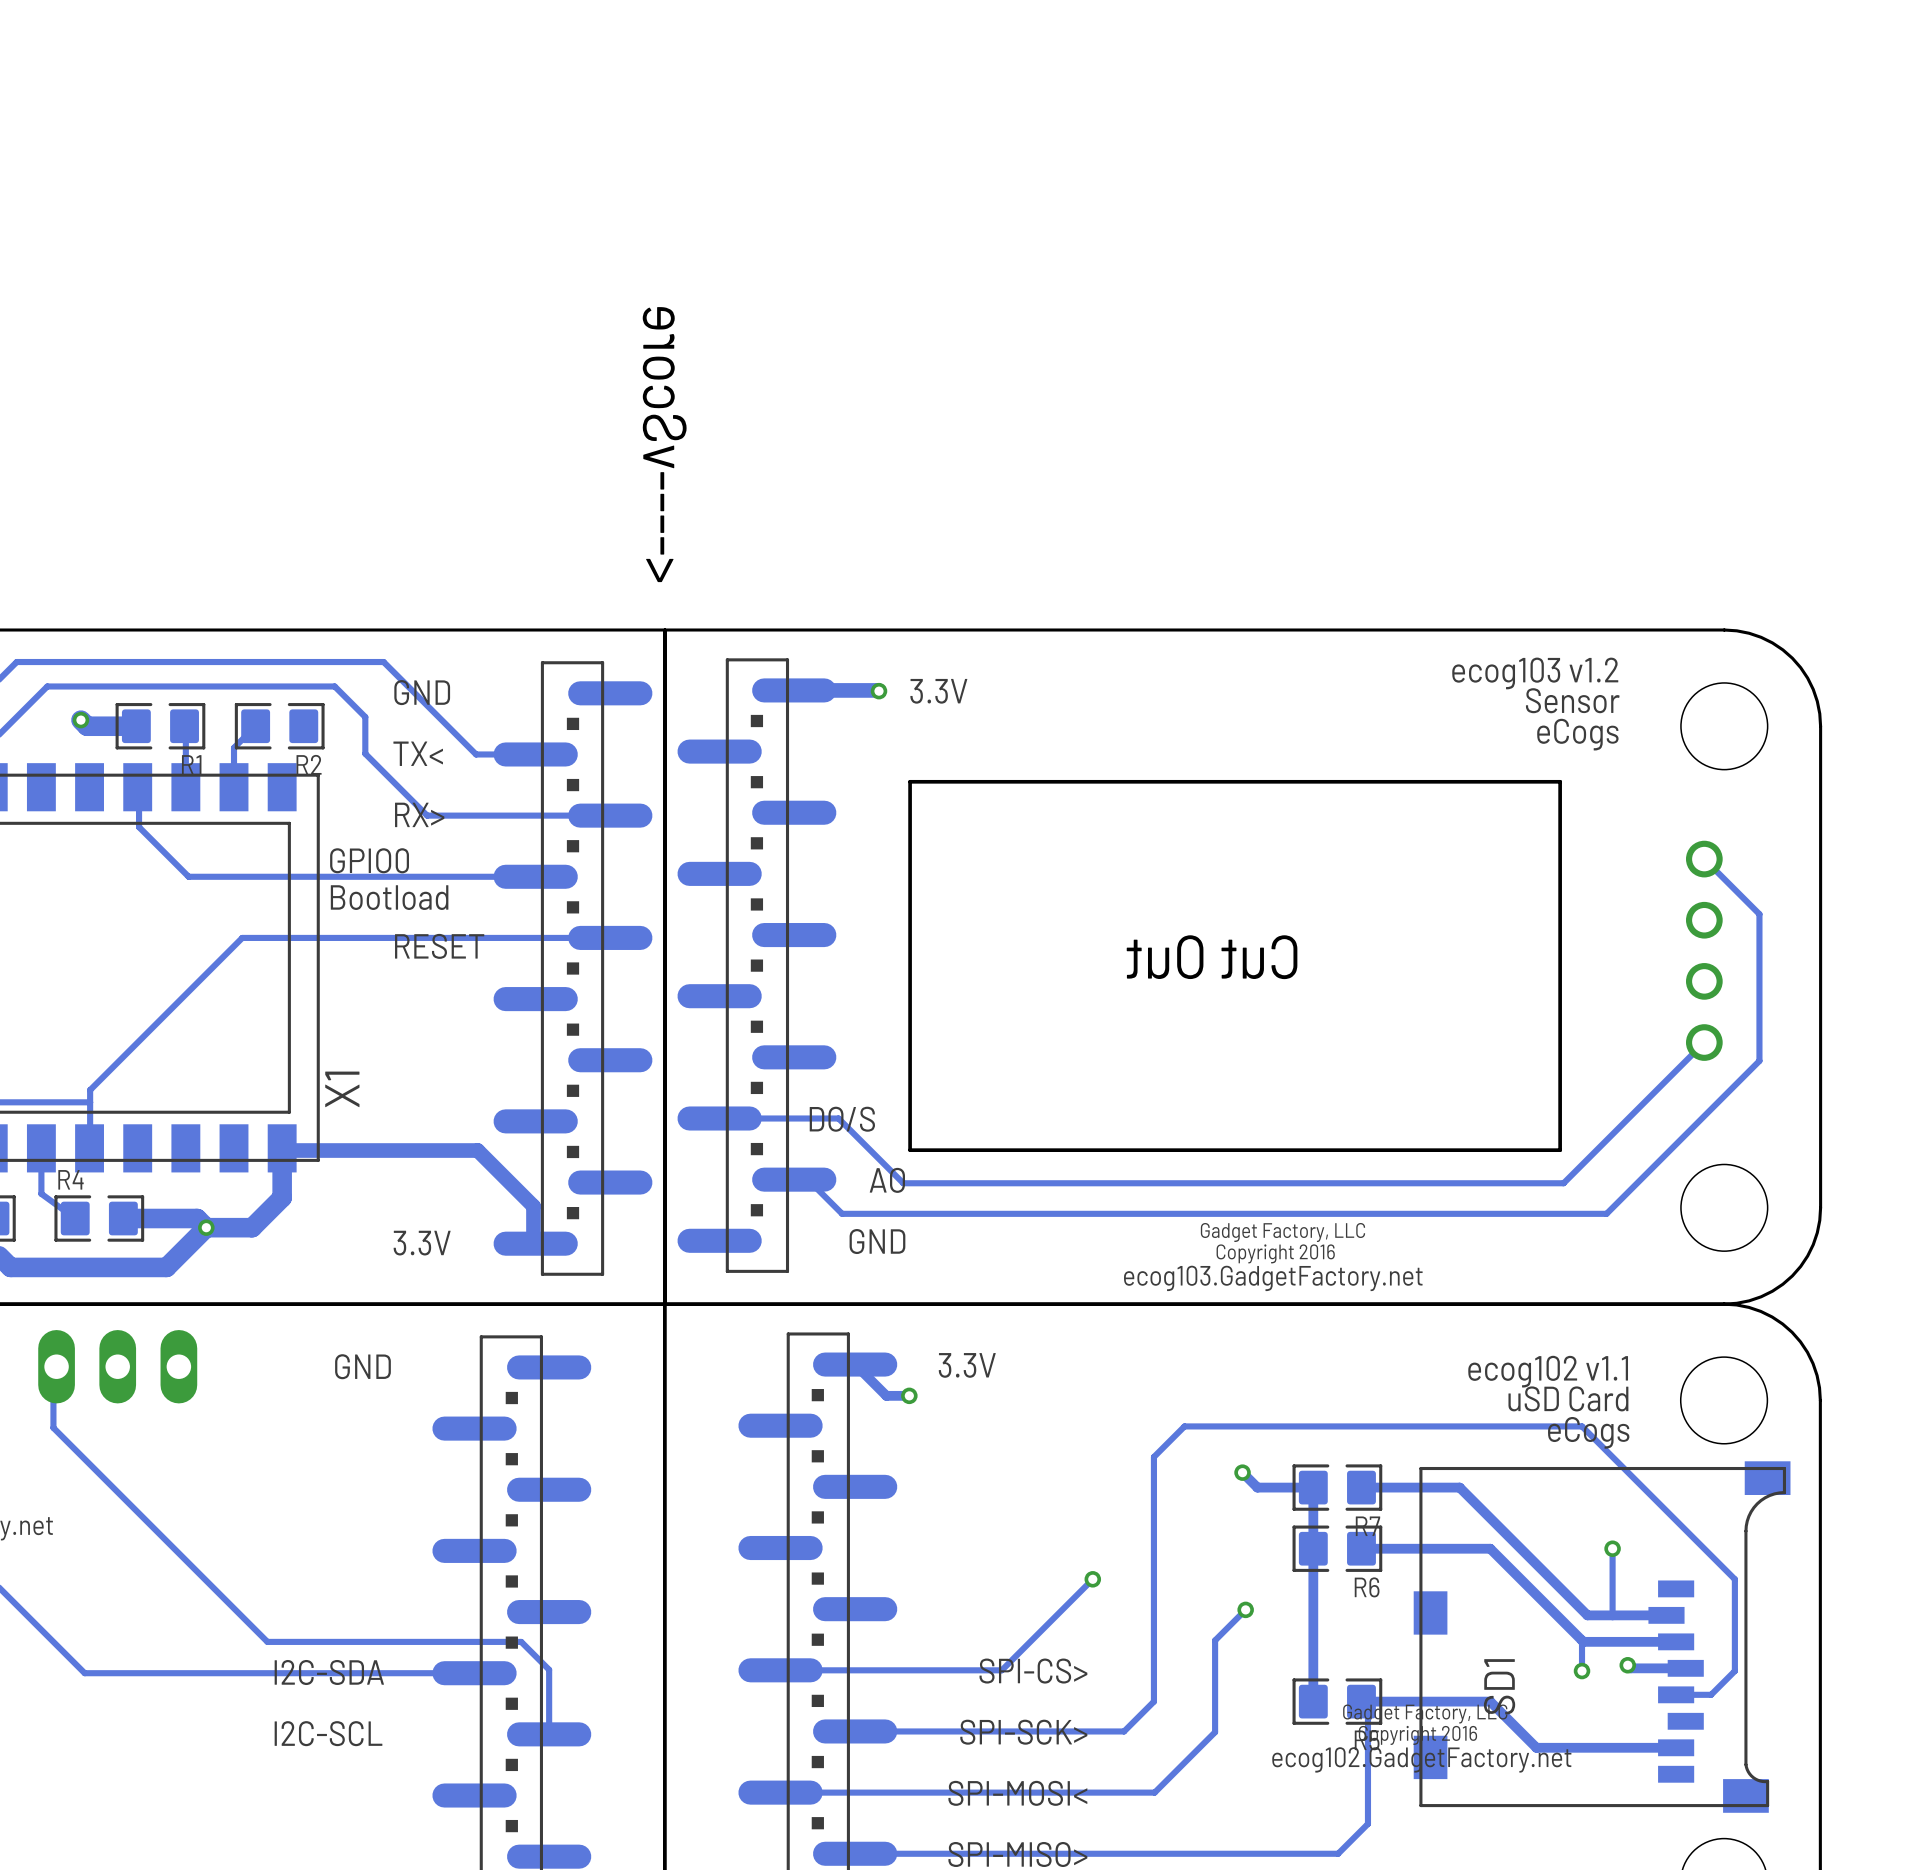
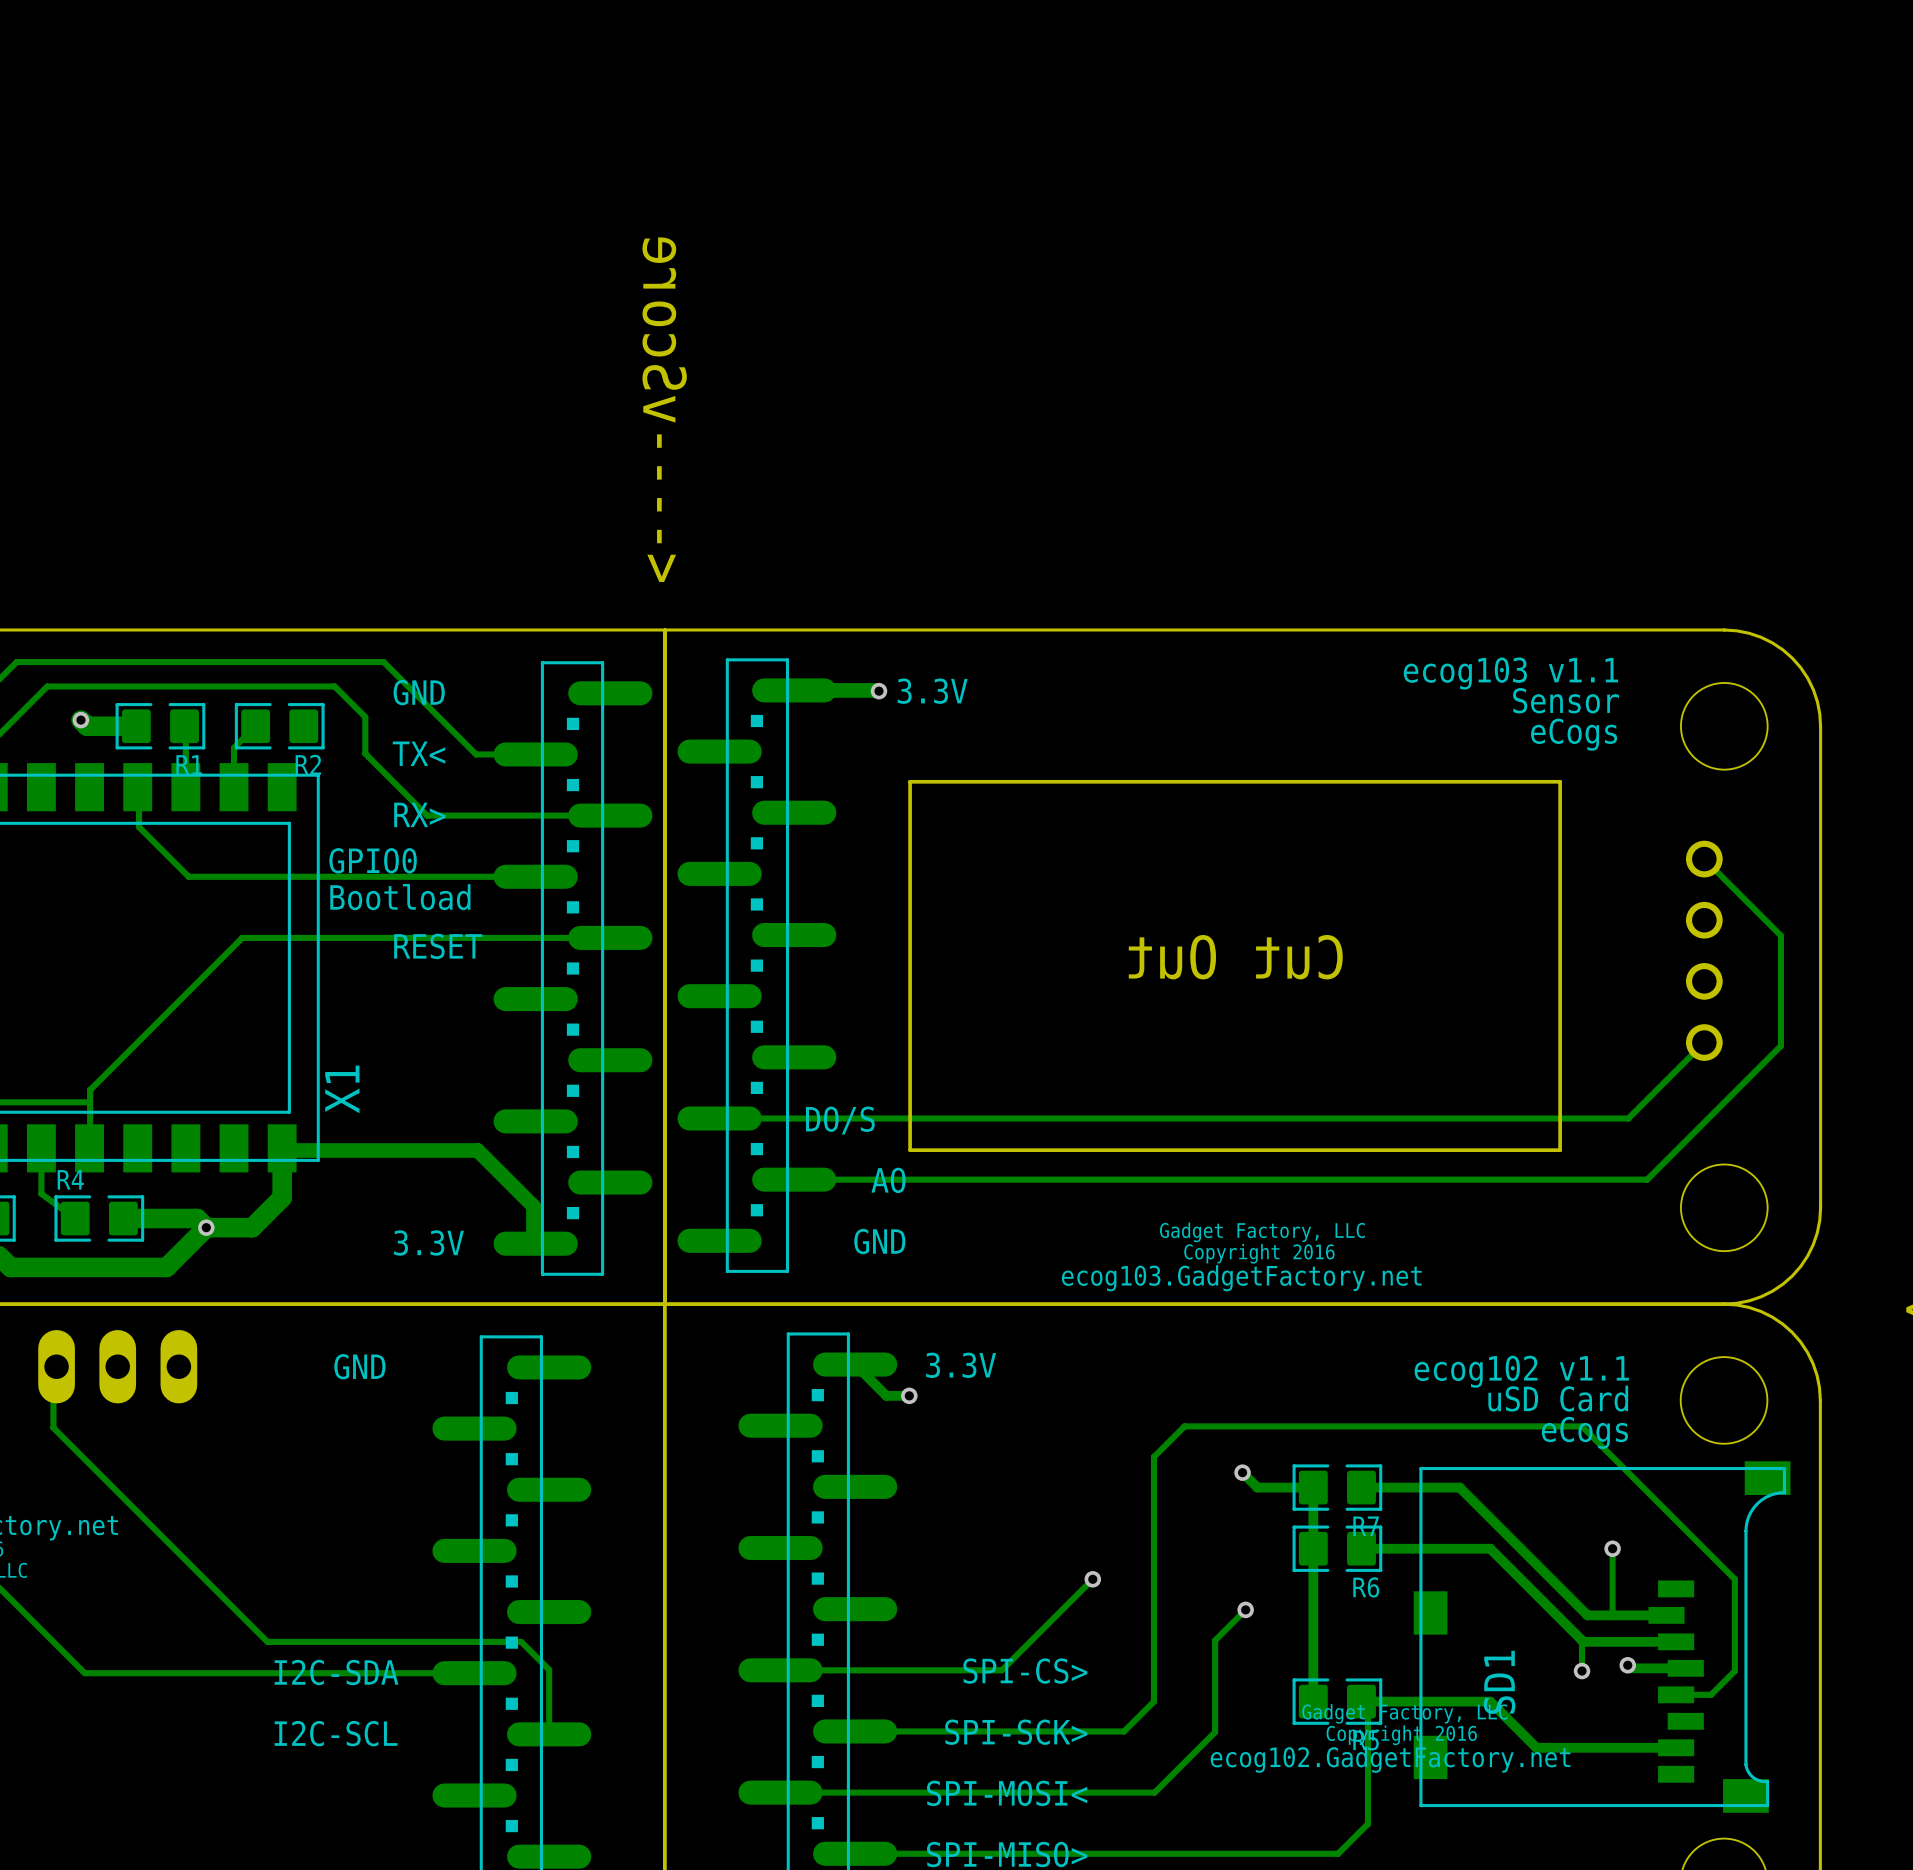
text: ecog103 v1.2 (1535, 673) -> ecog103 v1.1 (1510, 673)
track: (1759, 914) (1759, 1060) (1606, 1213) (842, 1213) (807, 1179) -> (1759, 914) (1781, 935) (1781, 1045) (1647, 1179) (807, 1179)
track: (1628, 1118) (1563, 1183) (903, 1183) (838, 1118) -> (1628, 1118) (838, 1118)

